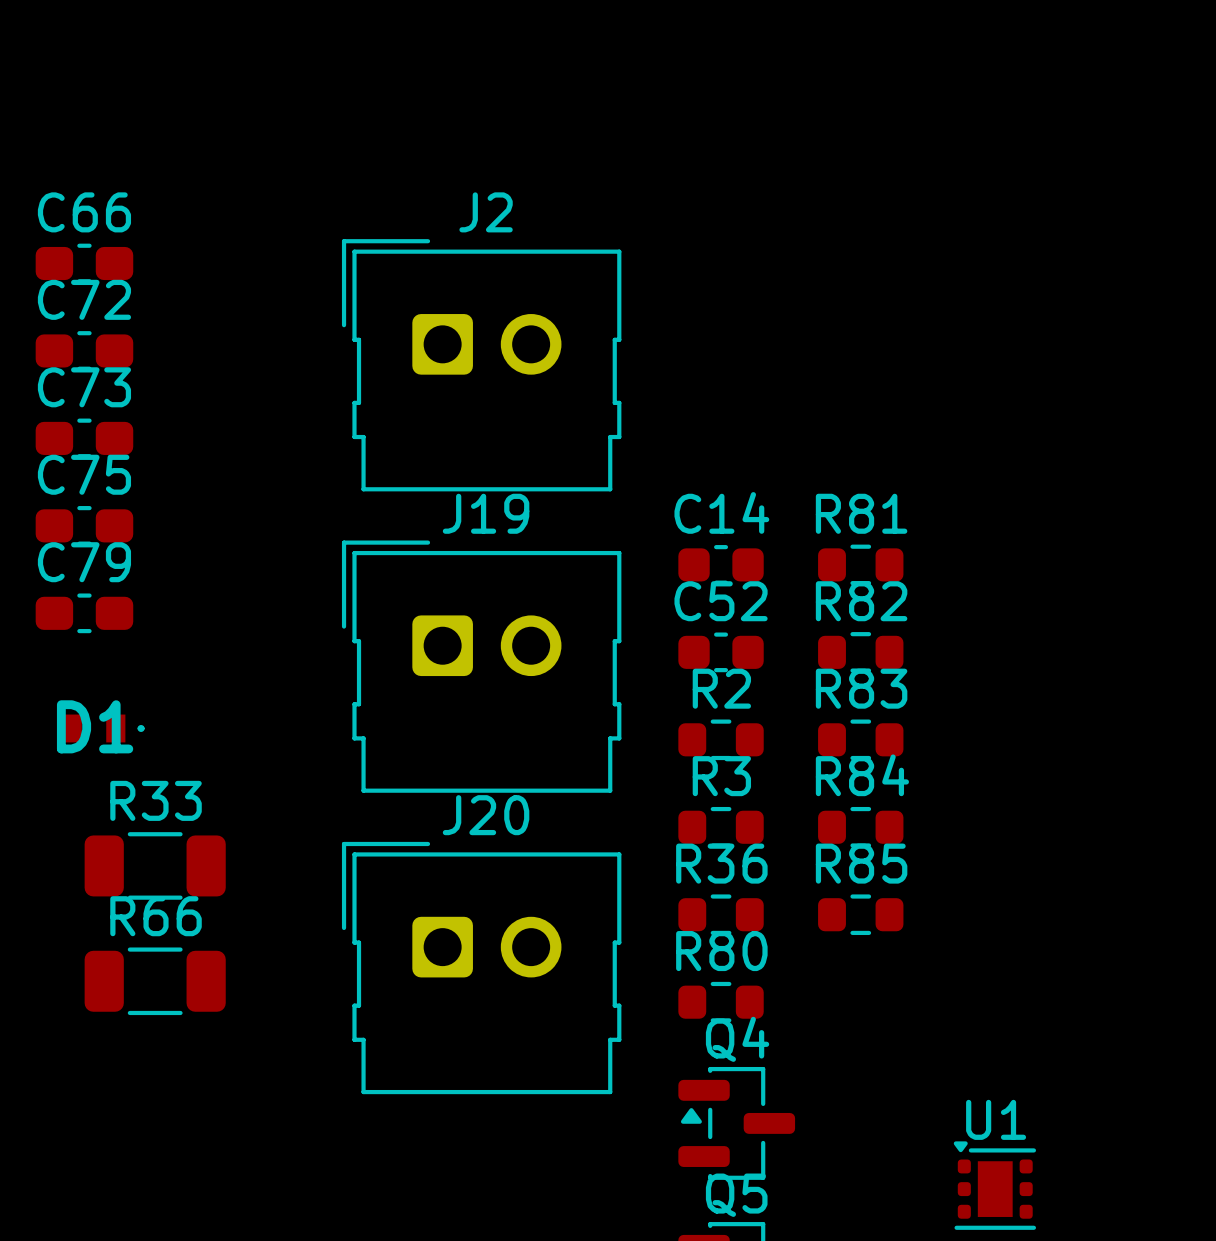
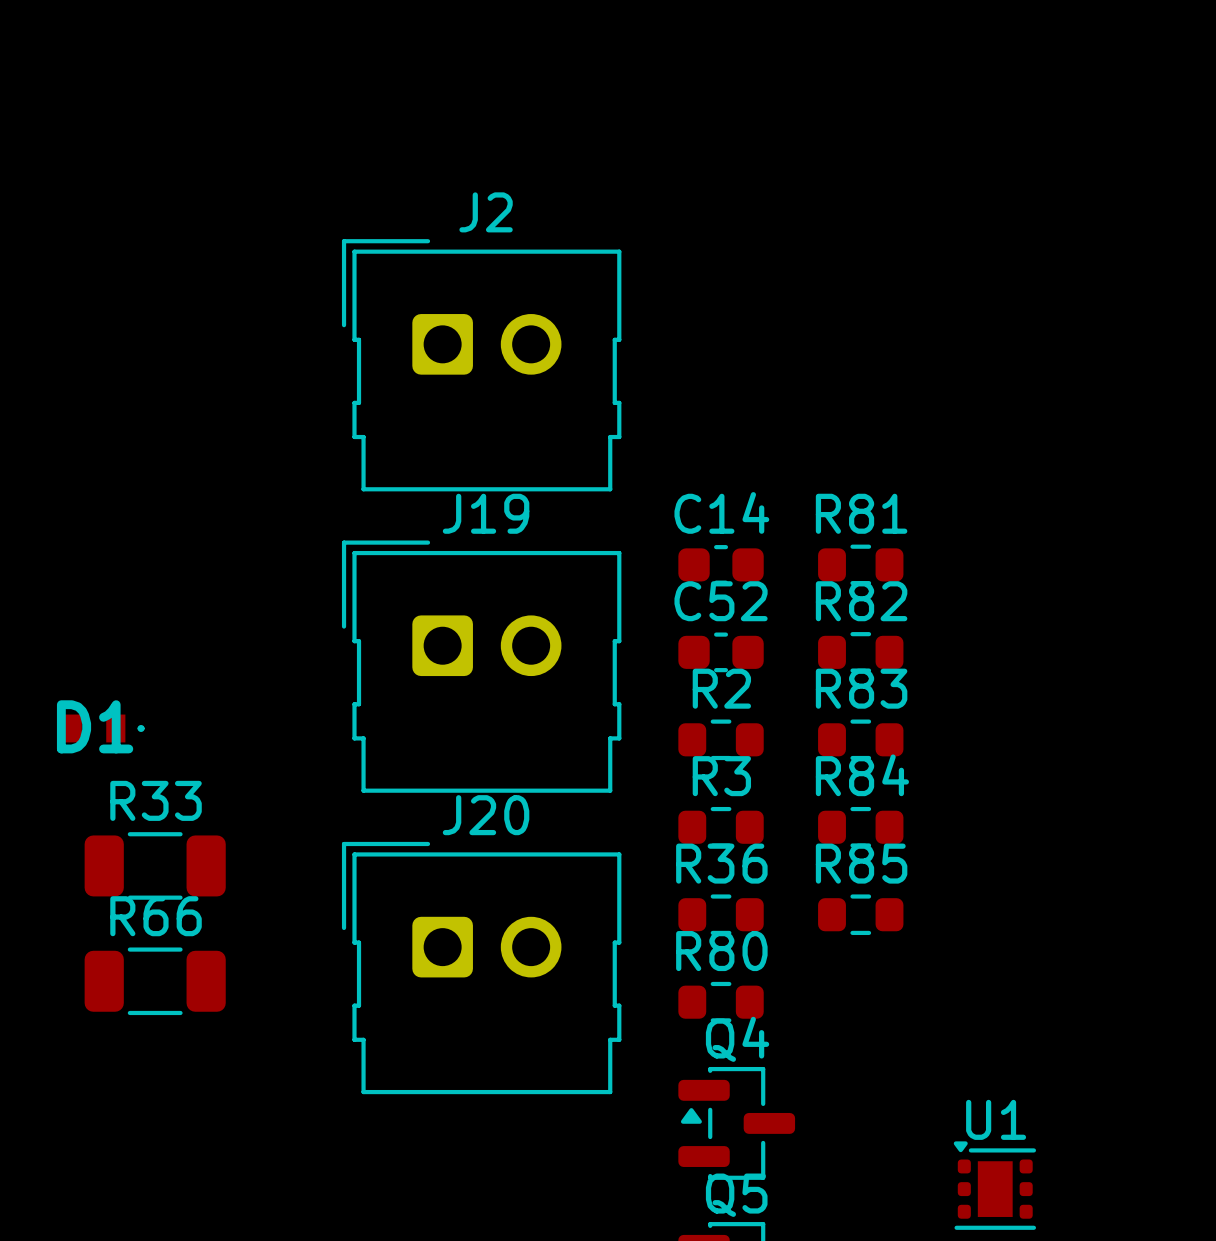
C66: (84, 263) -> none
C72: (84, 350) -> none
C73: (84, 438) -> none
C75: (84, 525) -> none
C79: (84, 613) -> none

